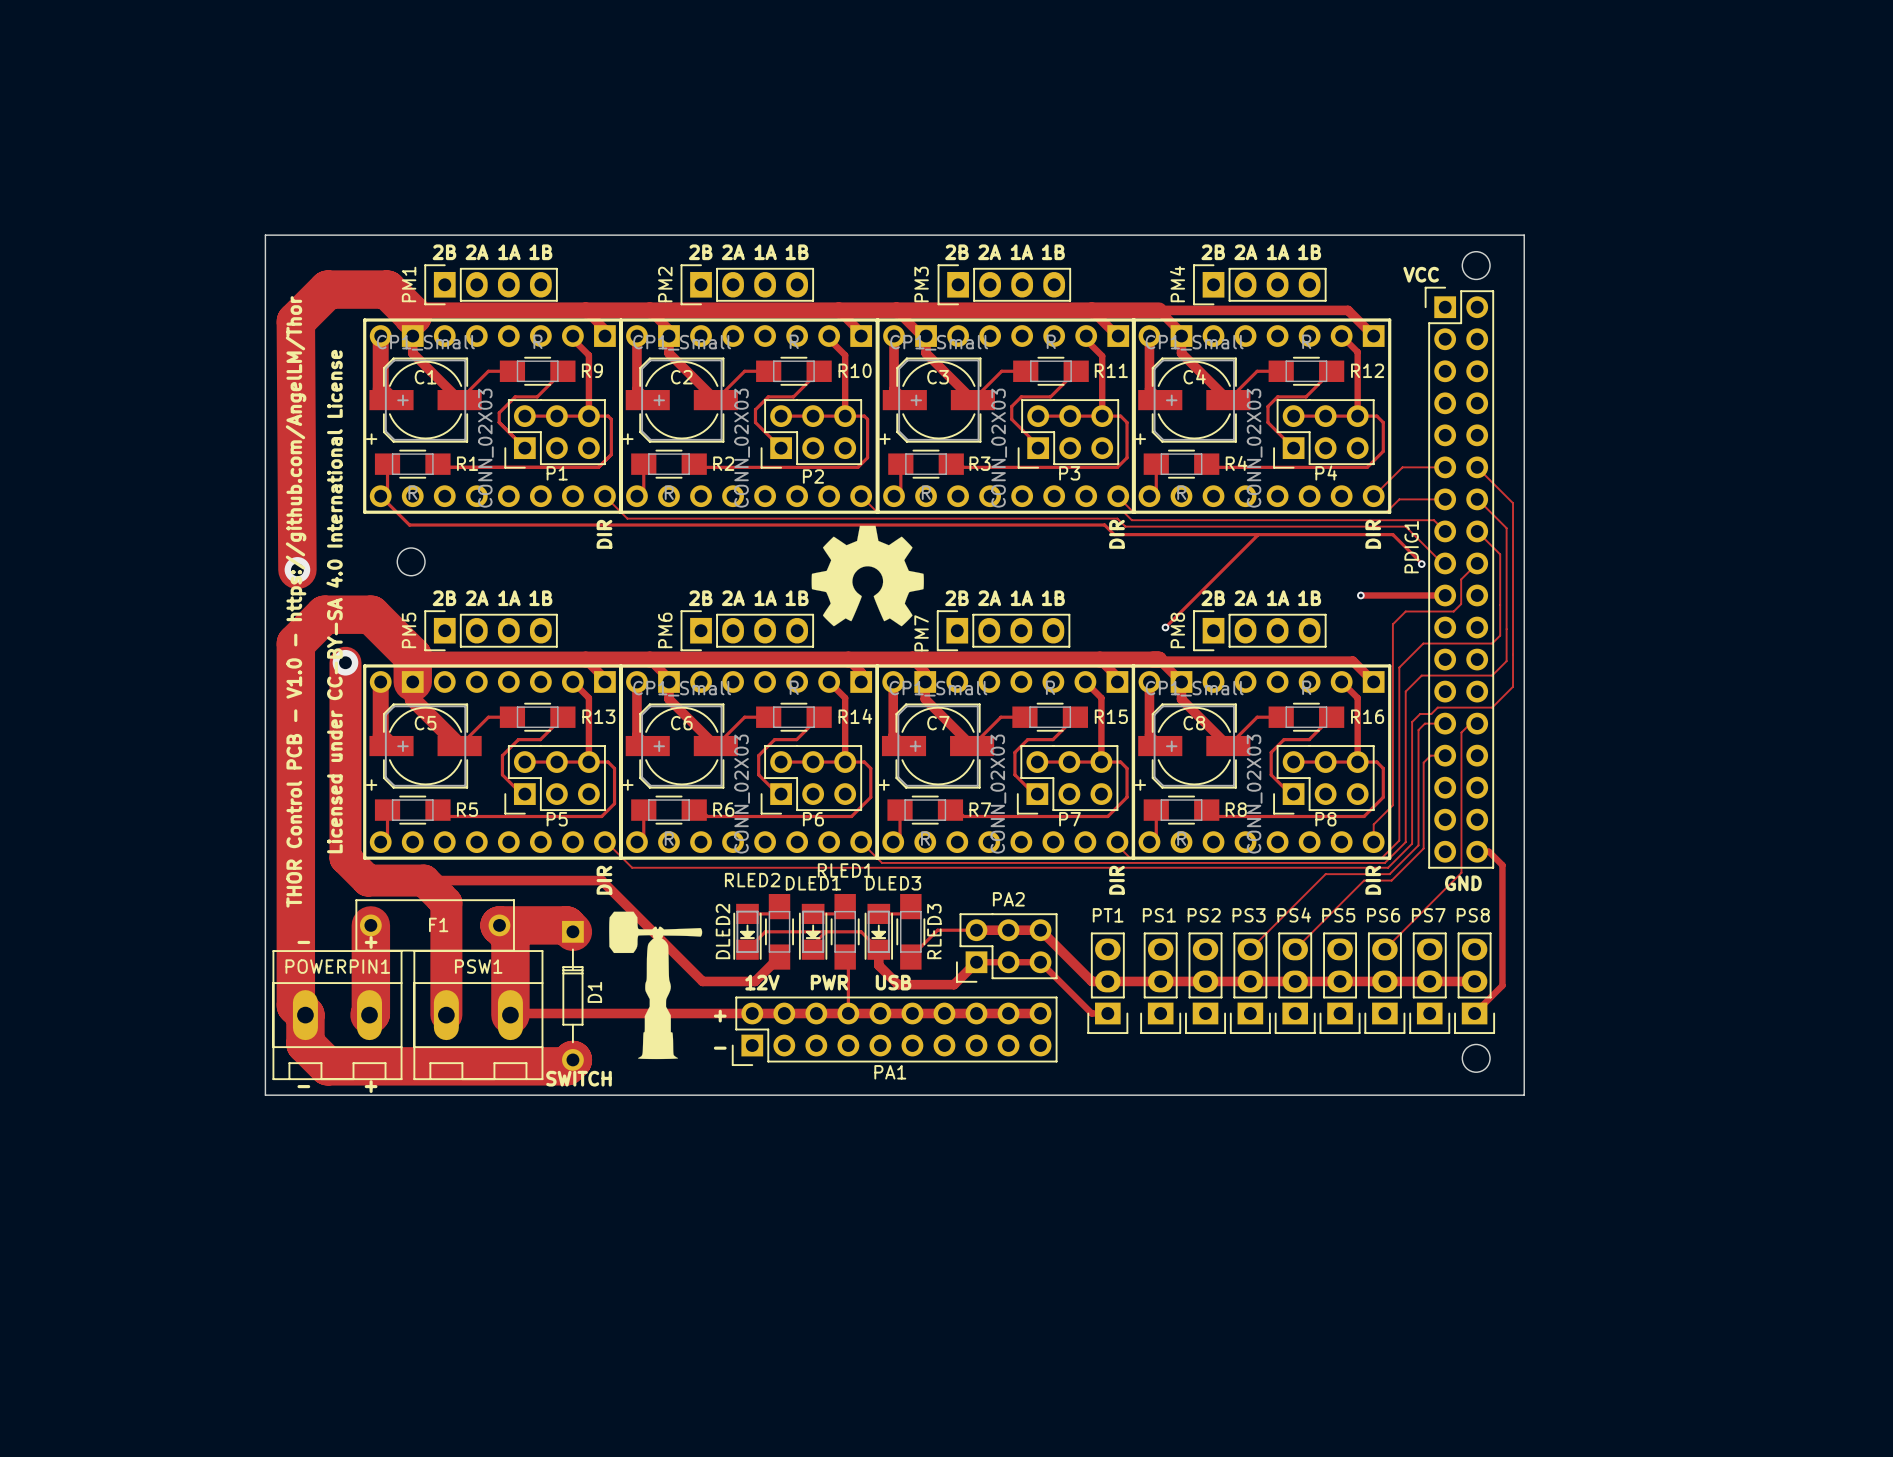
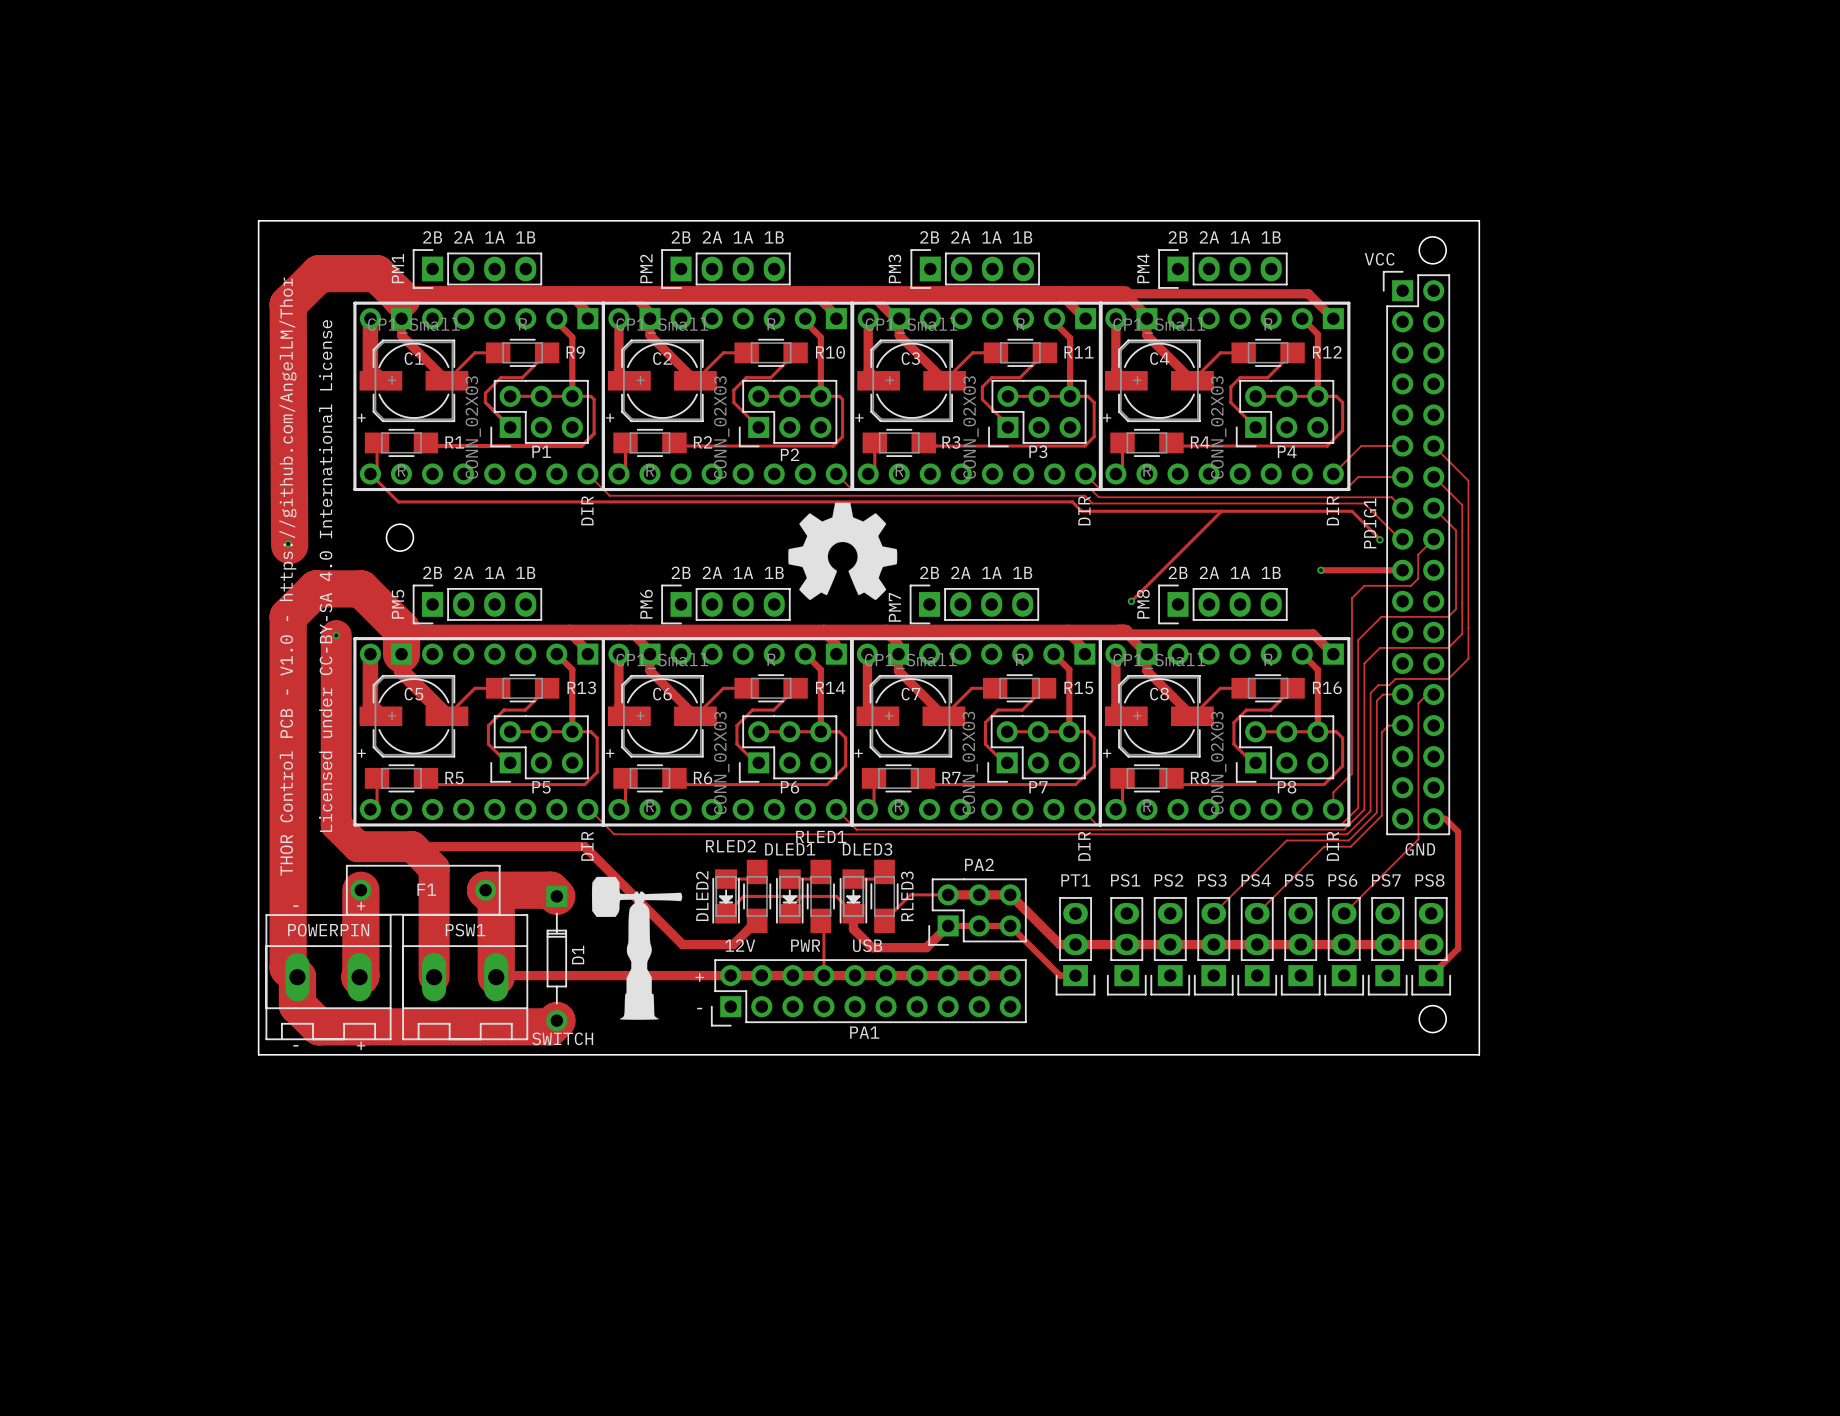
via size: [284, 557, 311, 583] -> [284, 540, 292, 548]
via size: [332, 649, 359, 676] -> [332, 631, 341, 640]
POWERPIN1 name: POWERPIN1 (337, 966) -> POWERPIN (328, 930)

